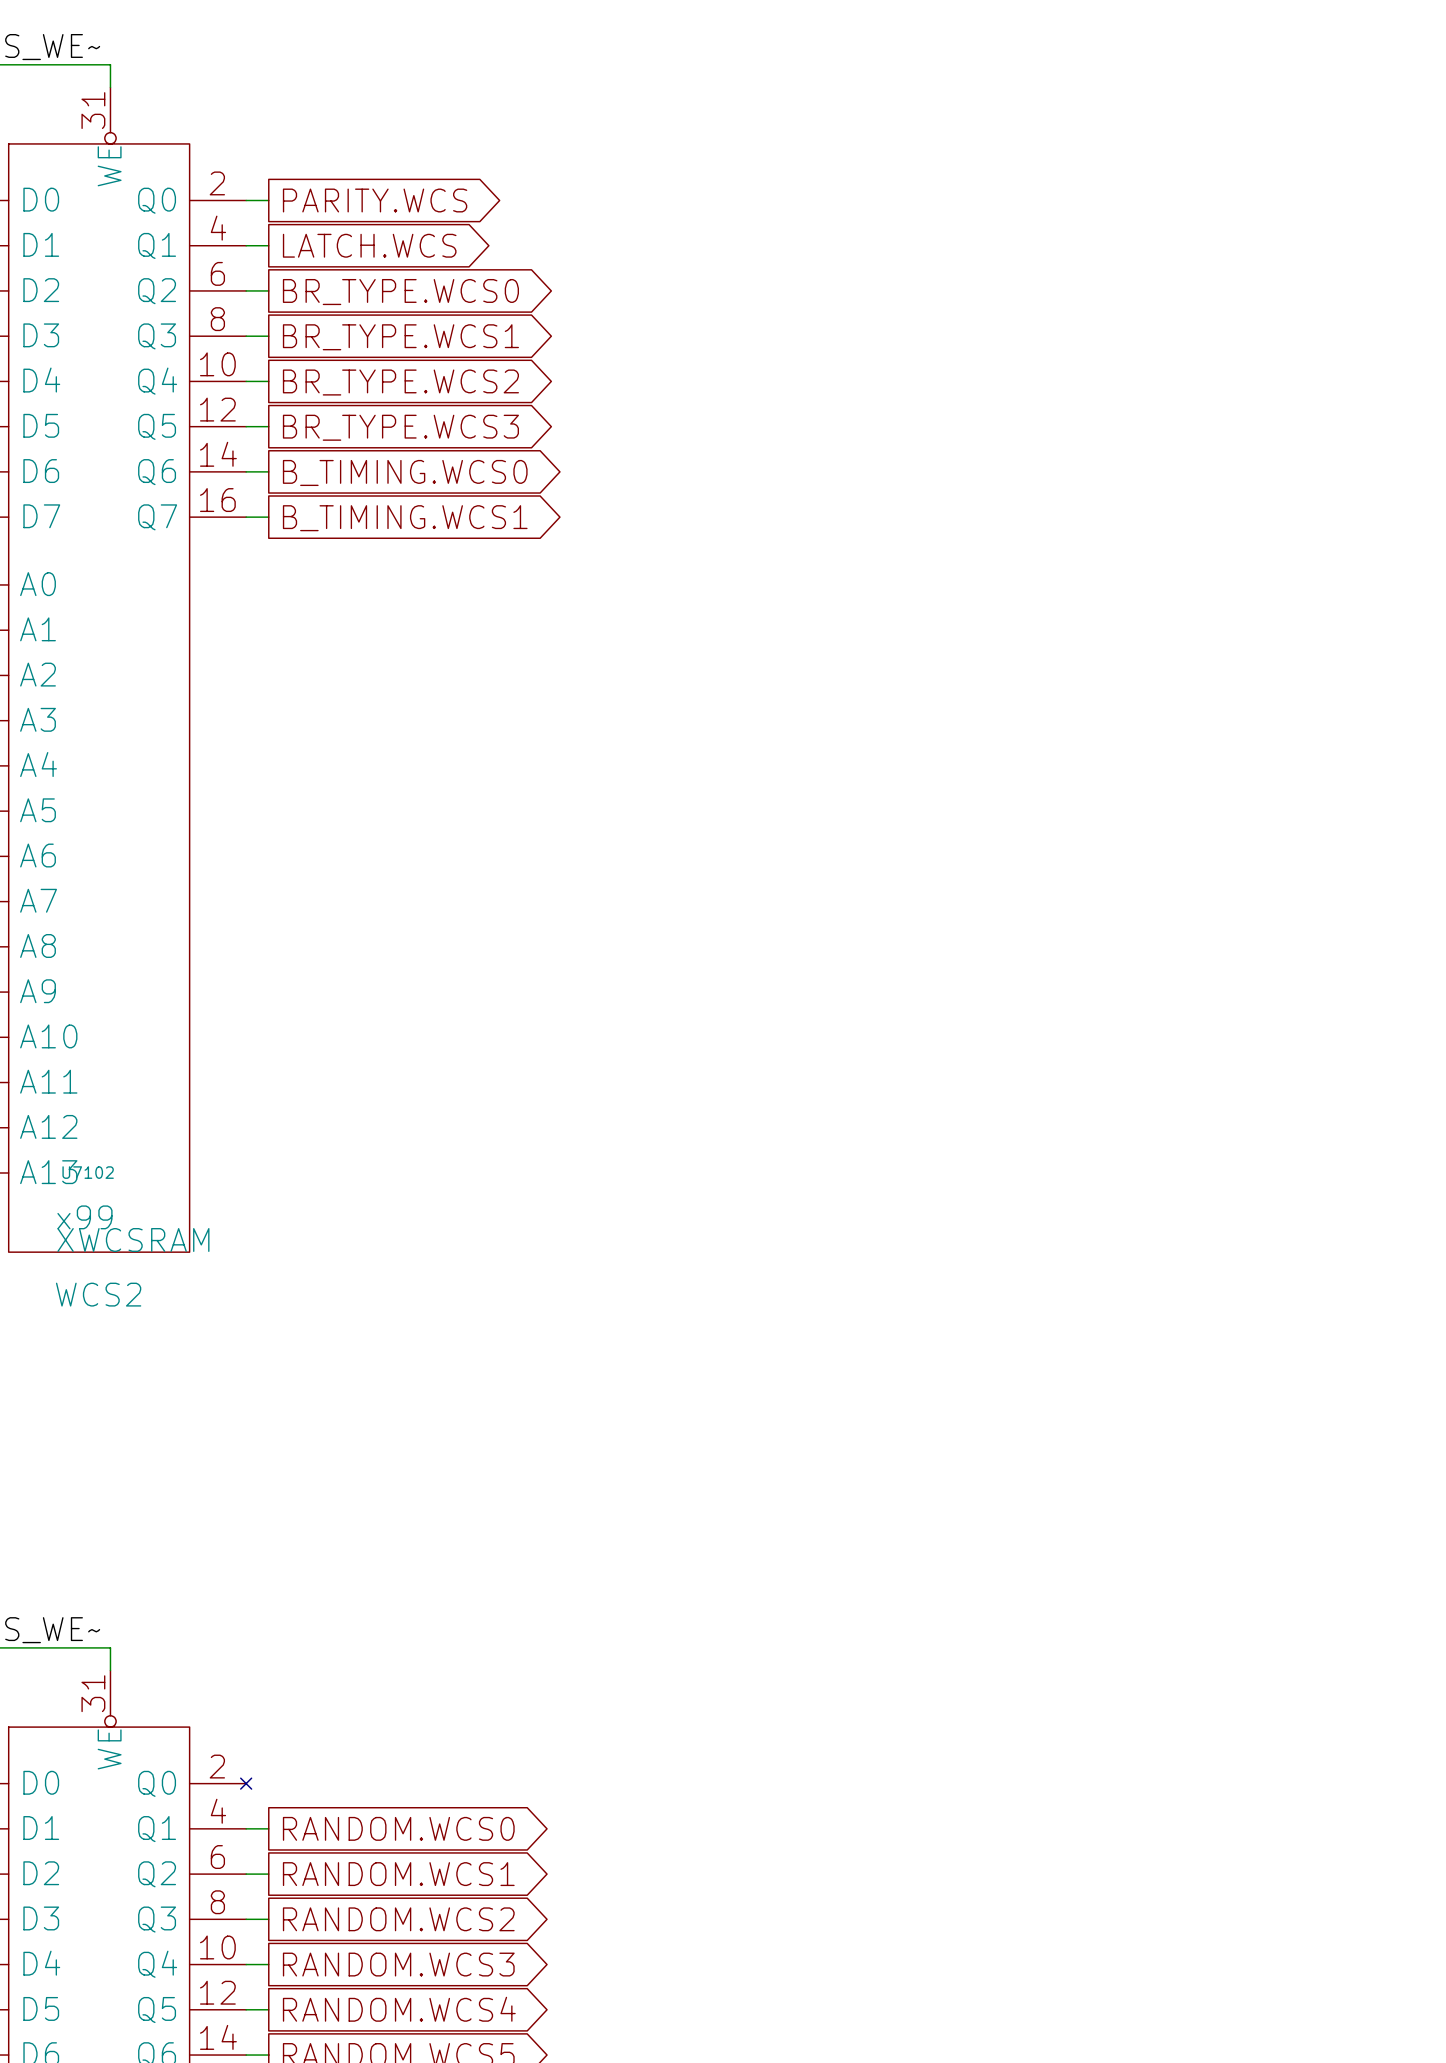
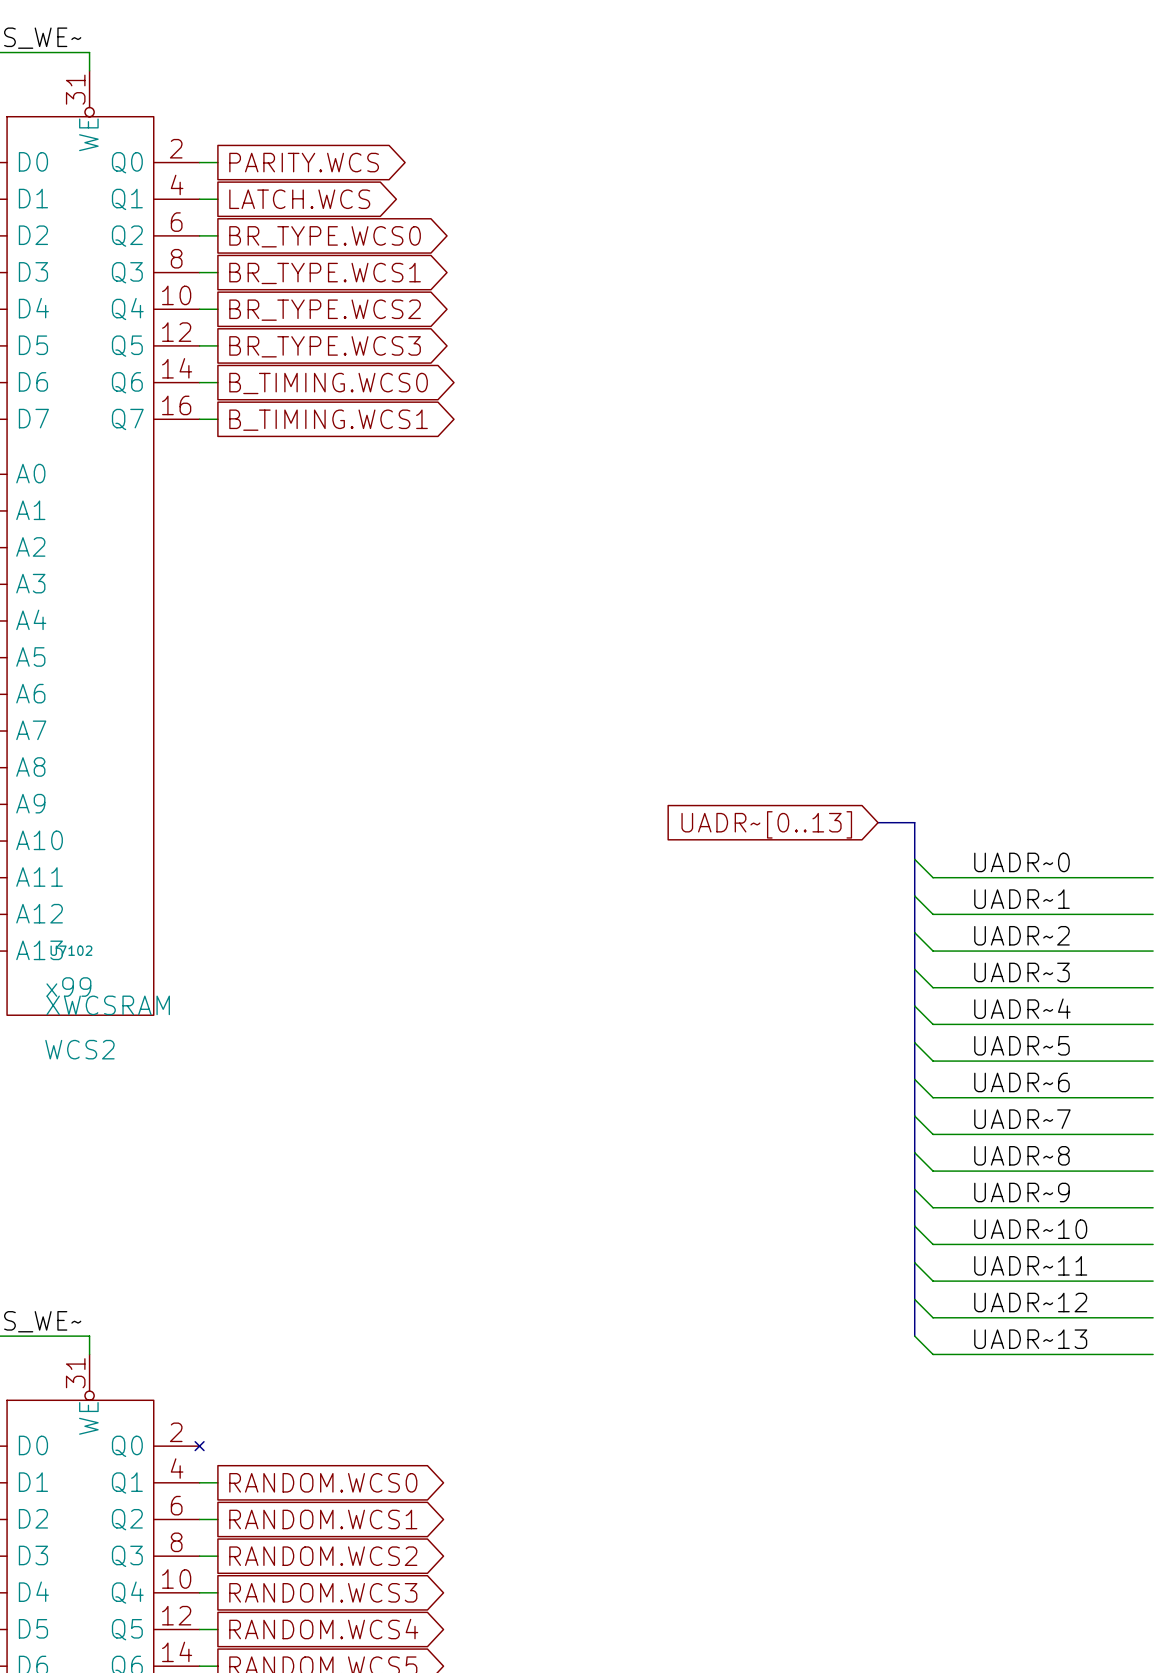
bus: none -> (878, 822) (914, 822) (914, 1336)
global label: none -> UADR~[0..13] (766, 824)
wire: none -> (914, 859) (933, 877) (1153, 877)
label: none -> UADR~0 (1021, 862)
wire: none -> (914, 896) (933, 914) (1153, 914)
label: none -> UADR~1 (1021, 899)
wire: none -> (914, 932) (933, 951) (1153, 951)
label: none -> UADR~2 (1021, 935)
wire: none -> (914, 969) (933, 987) (1153, 987)
label: none -> UADR~3 (1021, 972)
wire: none -> (914, 1006) (933, 1024) (1153, 1024)
label: none -> UADR~4 (1022, 1008)
wire: none -> (914, 1042) (933, 1061) (1153, 1061)
label: none -> UADR~5 (1021, 1045)
wire: none -> (914, 1079) (933, 1097) (1153, 1097)
label: none -> UADR~6 (1021, 1082)
wire: none -> (914, 1116) (933, 1134) (1153, 1134)
label: none -> UADR~7 (1022, 1119)
wire: none -> (914, 1152) (933, 1171) (1153, 1171)
label: none -> UADR~8 (1021, 1155)
wire: none -> (914, 1189) (933, 1207) (1153, 1207)
label: none -> UADR~9 (1021, 1192)
wire: none -> (914, 1226) (933, 1244) (1153, 1244)
label: none -> UADR~10 (1030, 1229)
wire: none -> (914, 1262) (933, 1281) (1153, 1281)
label: none -> UADR~11 (1030, 1265)
wire: none -> (914, 1299) (933, 1317) (1153, 1317)
label: none -> UADR~12 (1030, 1302)
wire: none -> (914, 1336) (933, 1354) (1153, 1354)
label: none -> UADR~13 (1030, 1339)

